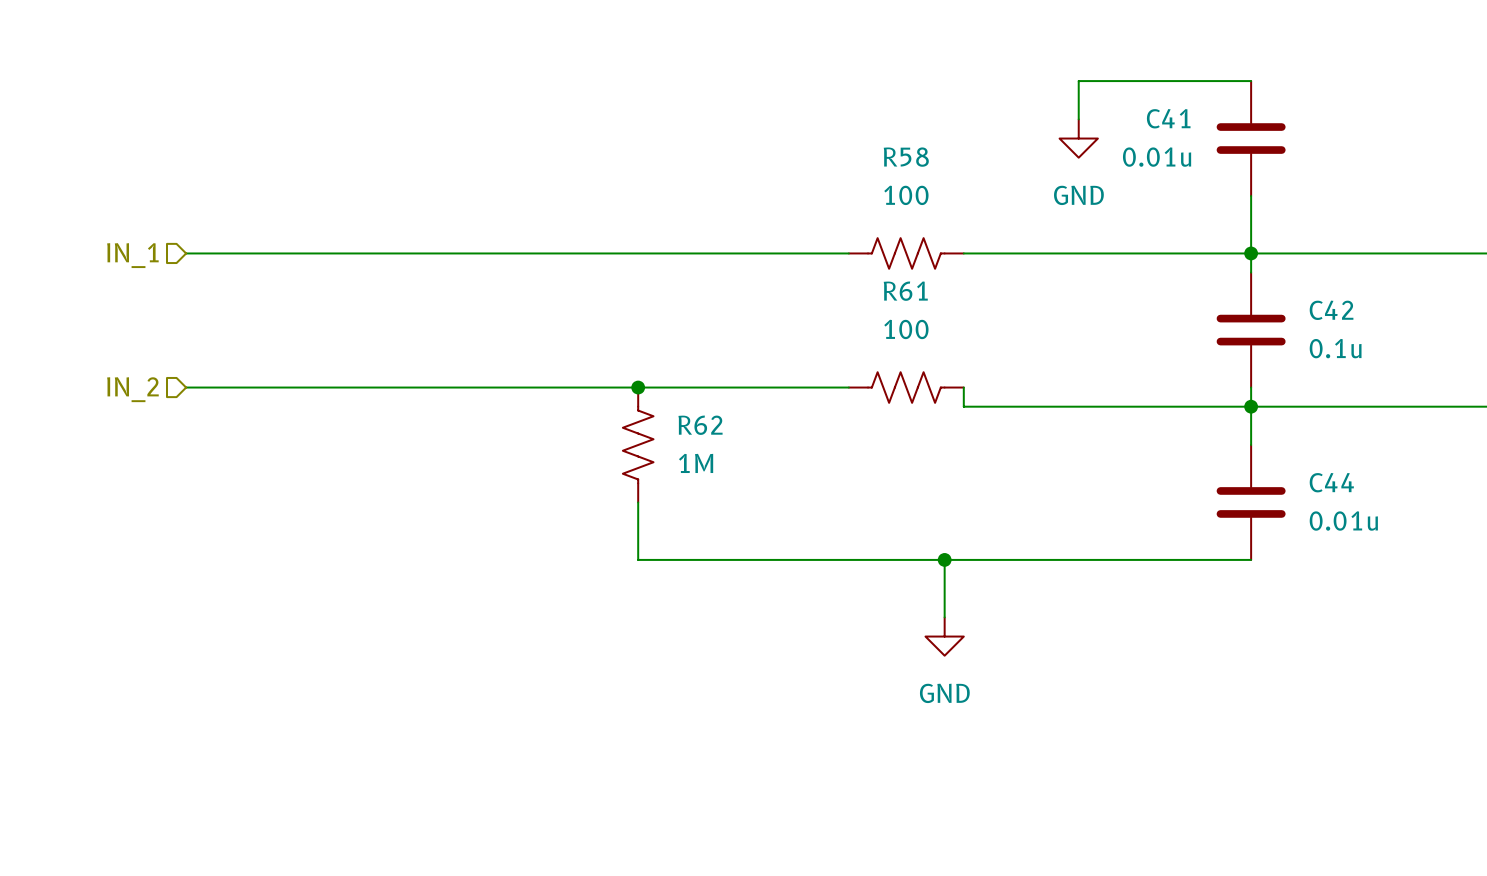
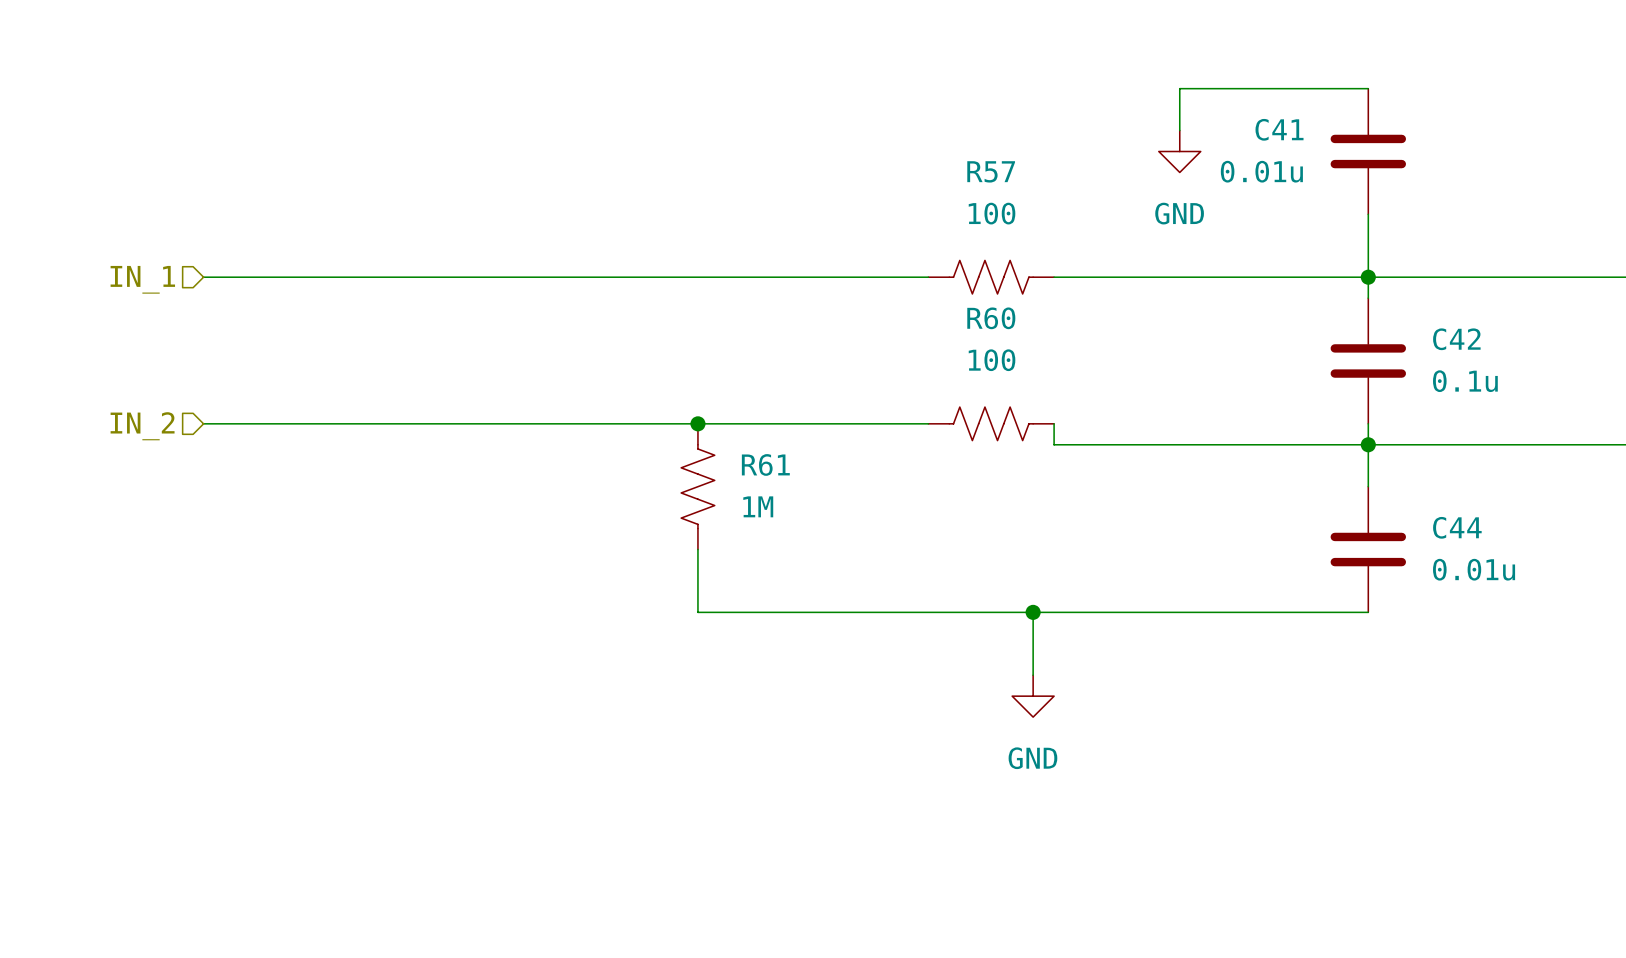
R58 name: R58 (906, 157) -> R57 (991, 171)
R61 name: R61 (905, 291) -> R60 (991, 318)
R62 name: R62 (700, 425) -> R61 (765, 464)

